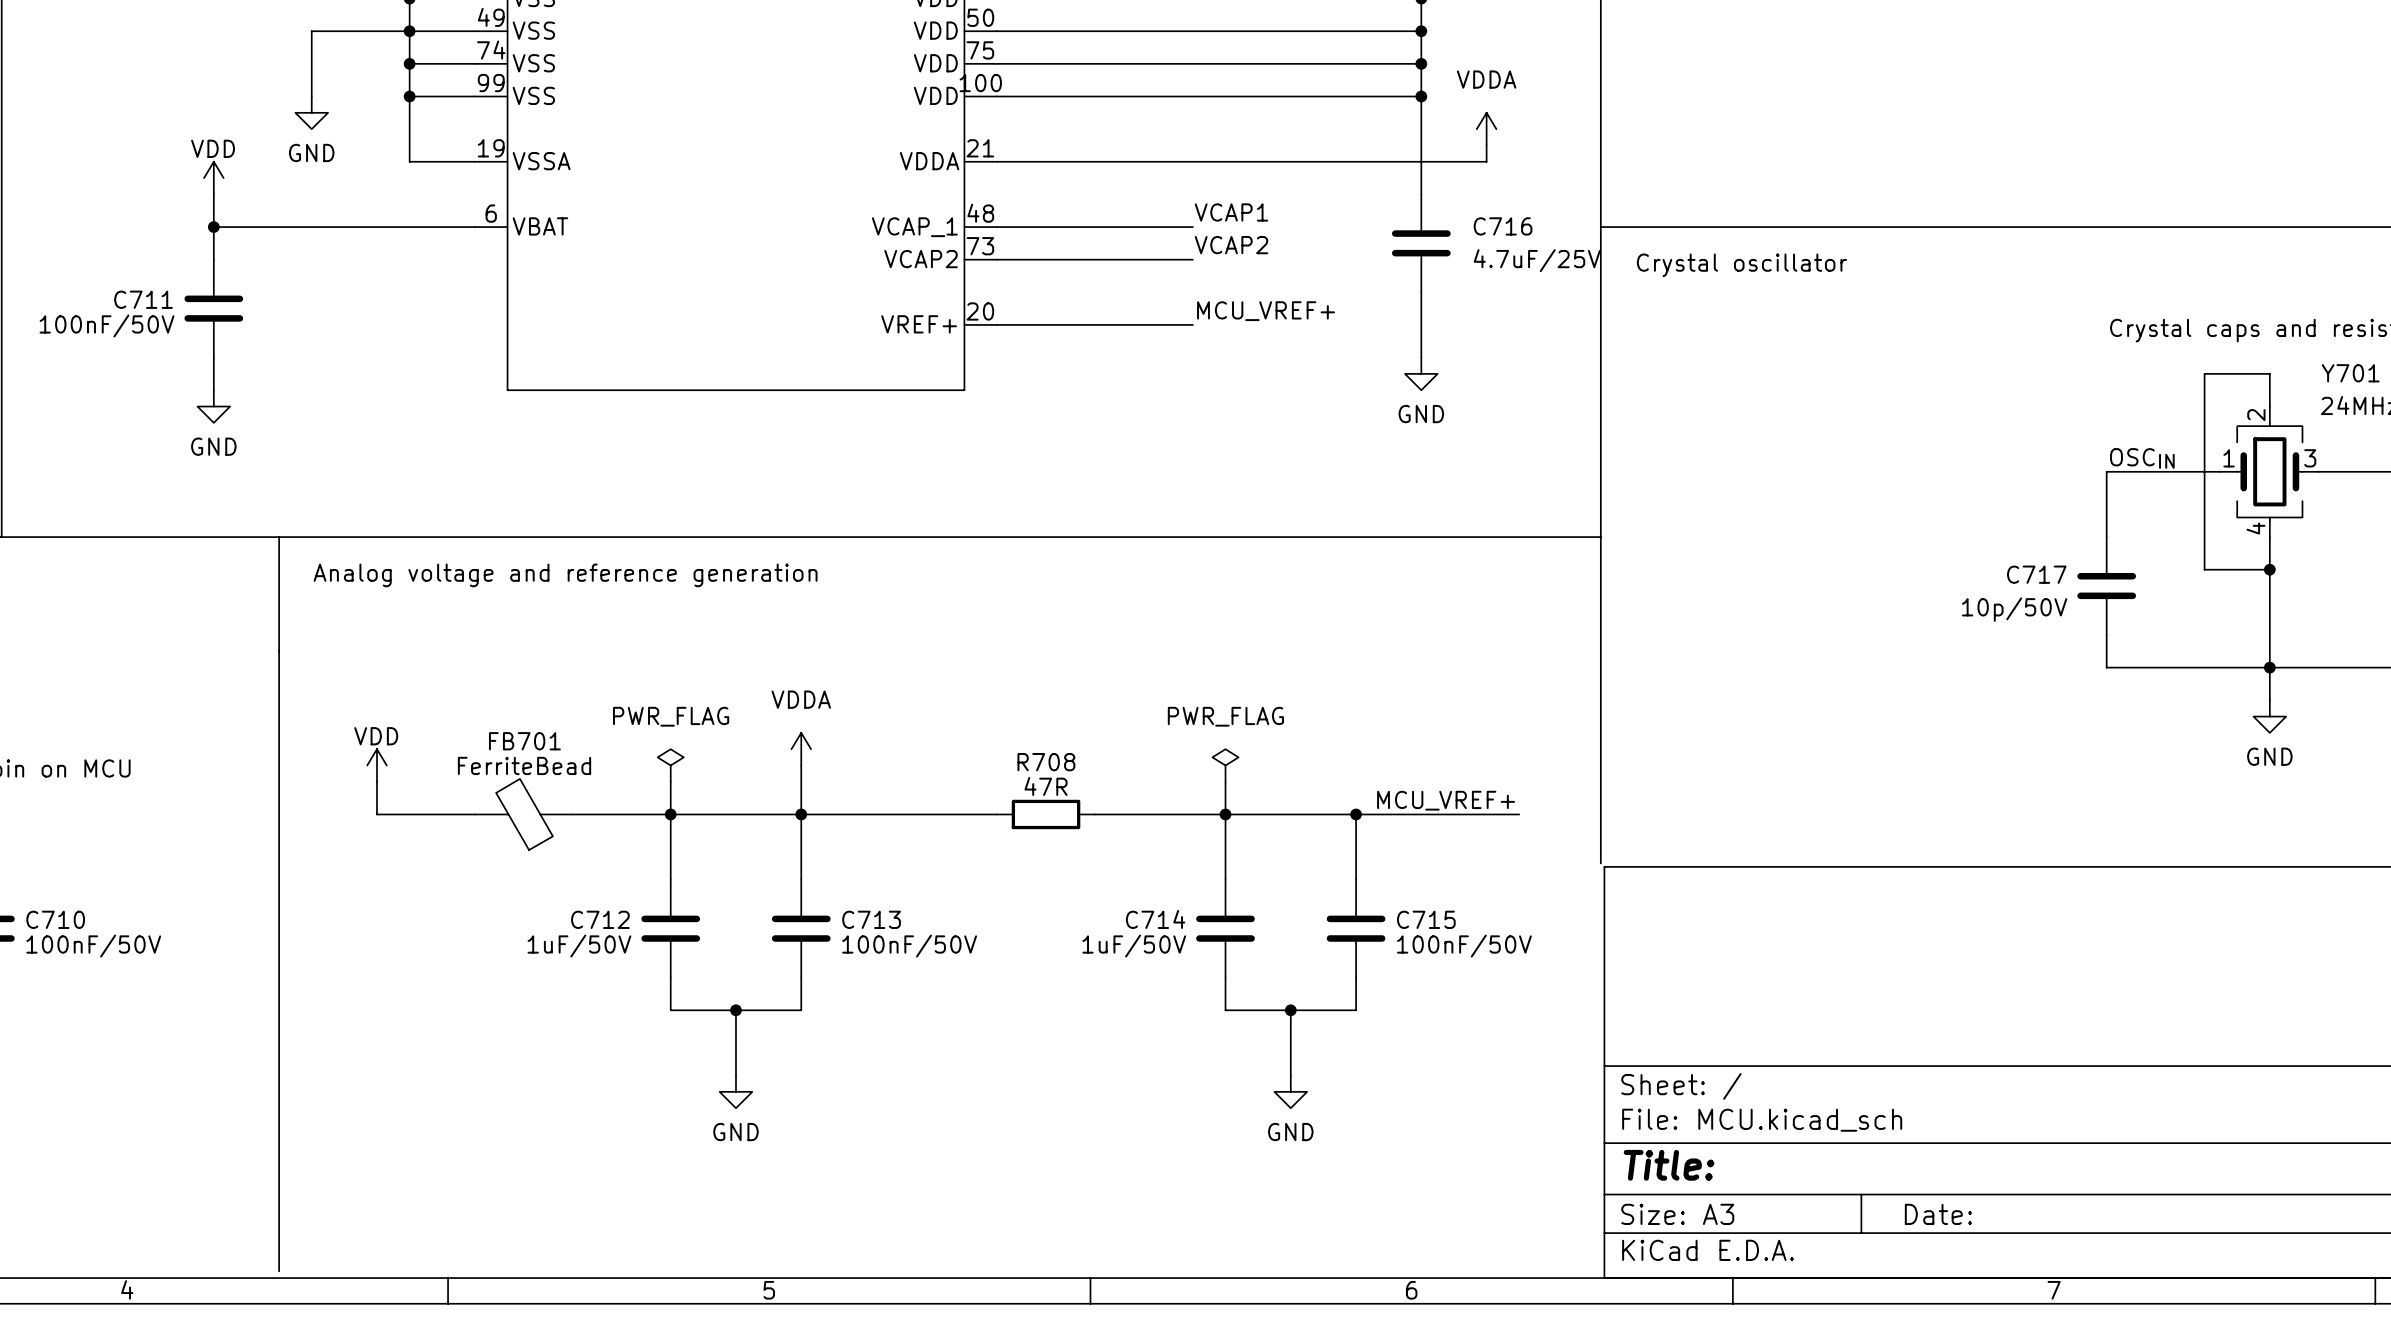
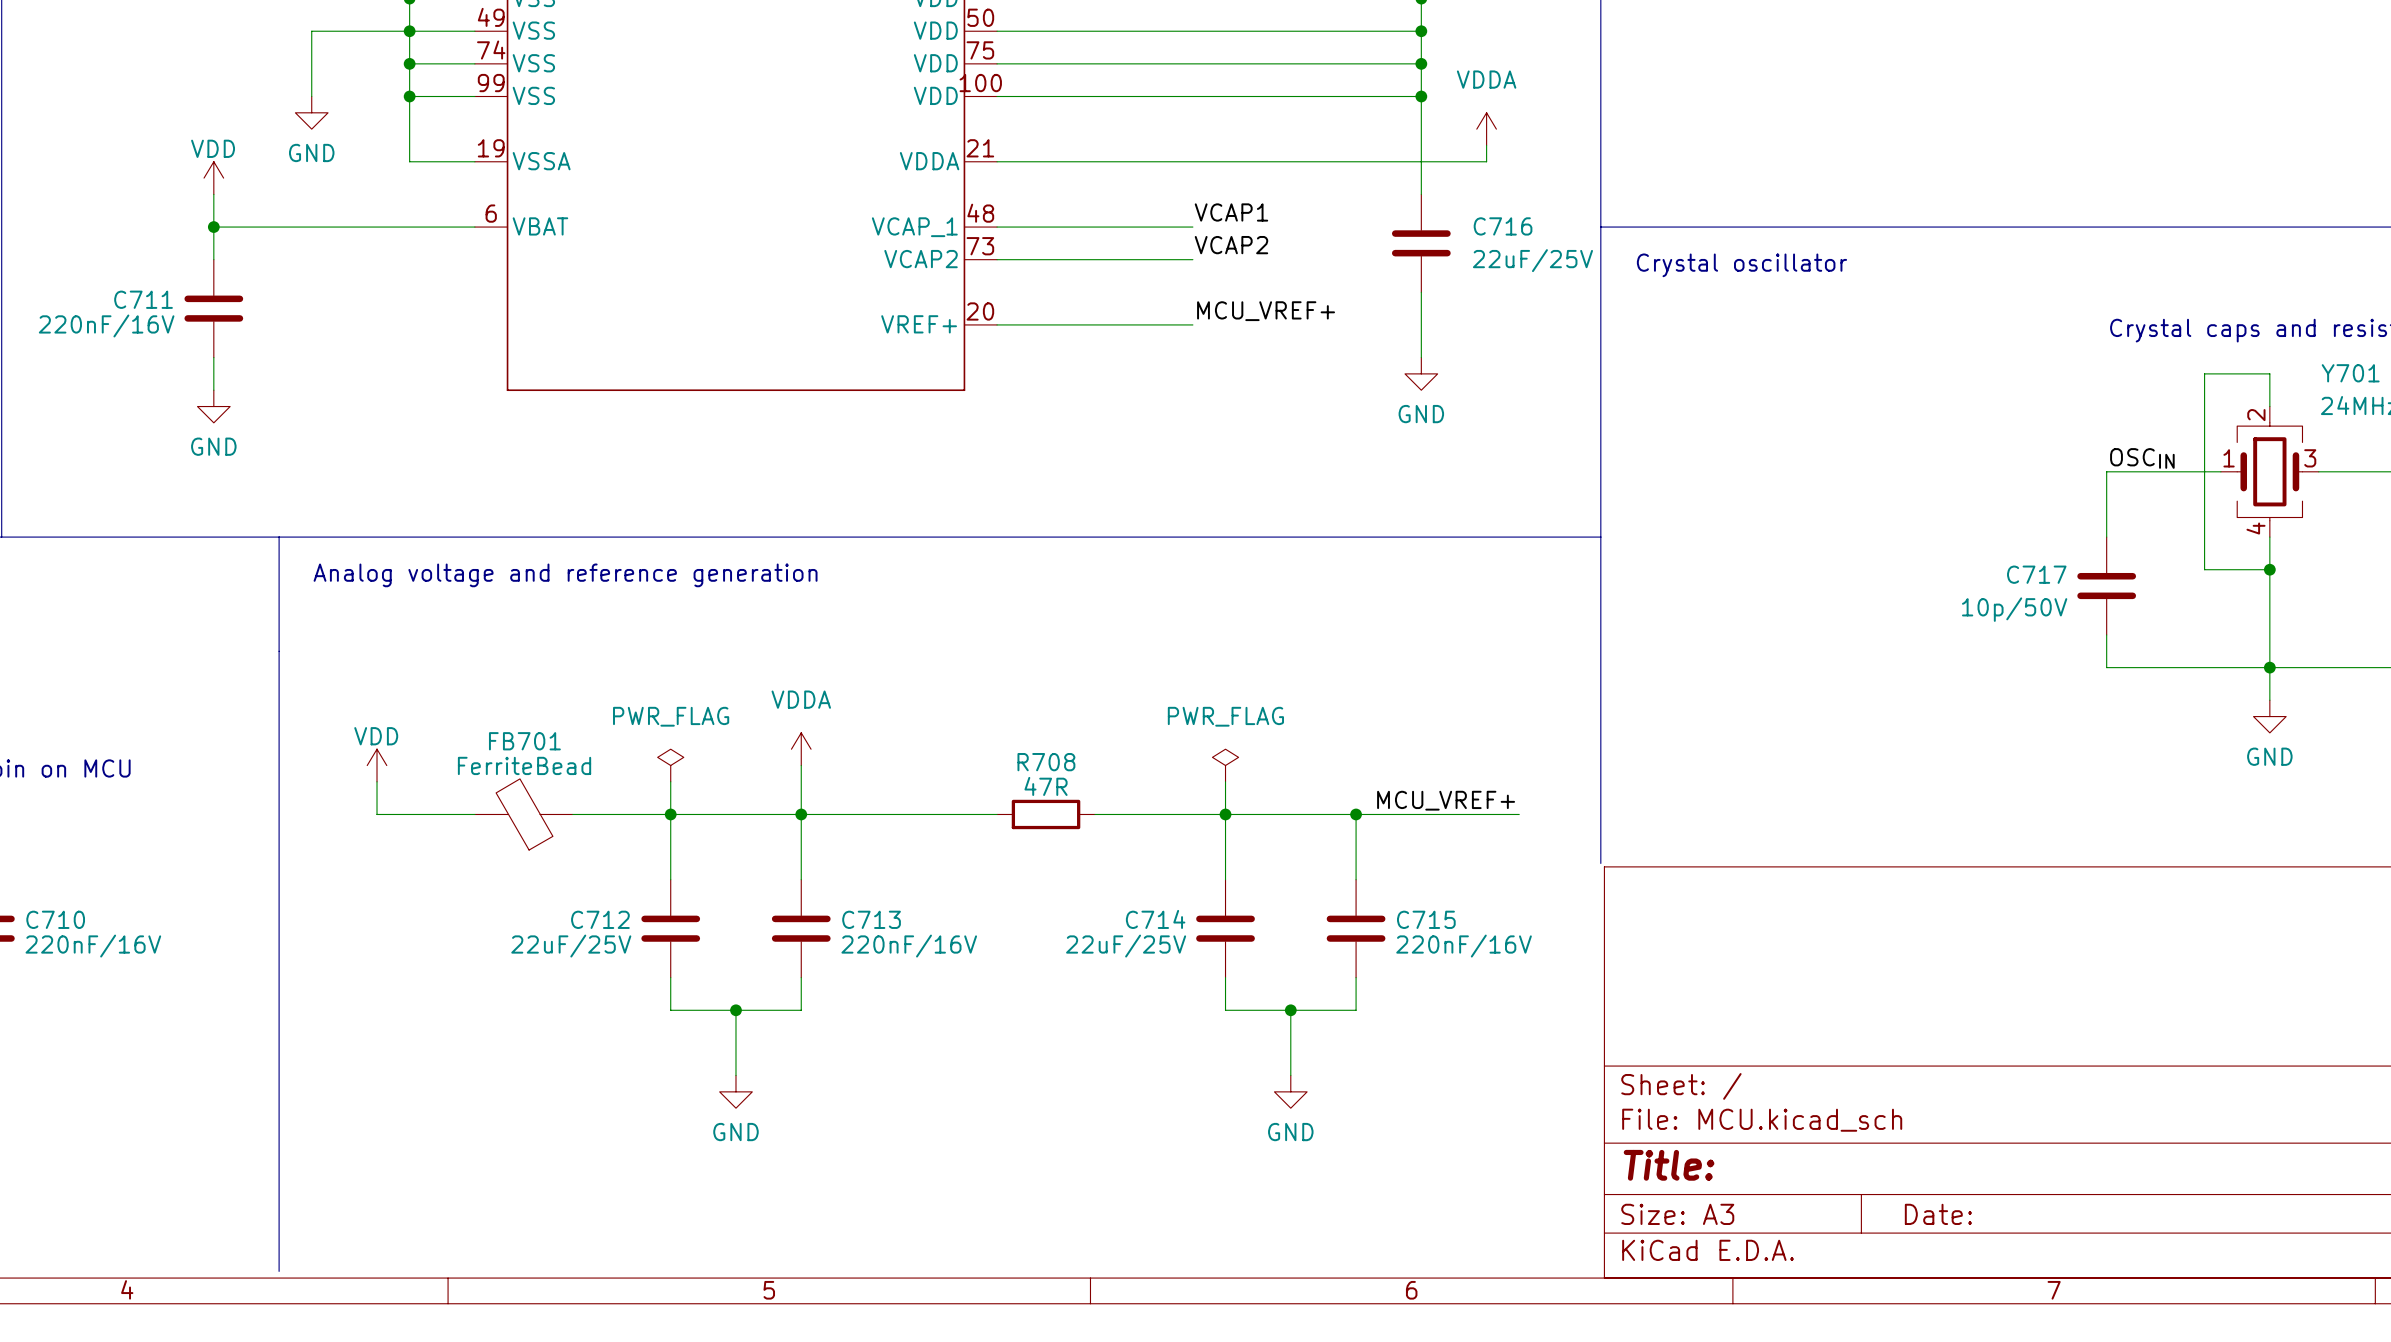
C716 value: 4.7uF/25V (1537, 260) -> 22uF/25V (1532, 260)
C711 value: 100nF/50V (107, 325) -> 220nF/16V (106, 325)
C710 value: 100nF/50V (93, 946) -> 220nF/16V (93, 946)
C712 value: 1uF/50V (579, 946) -> 22uF/25V (571, 946)
C713 value: 100nF/50V (909, 946) -> 220nF/16V (909, 946)
C714 value: 1uF/50V (1134, 946) -> 22uF/25V (1126, 946)
C715 value: 100nF/50V (1464, 946) -> 220nF/16V (1464, 946)

